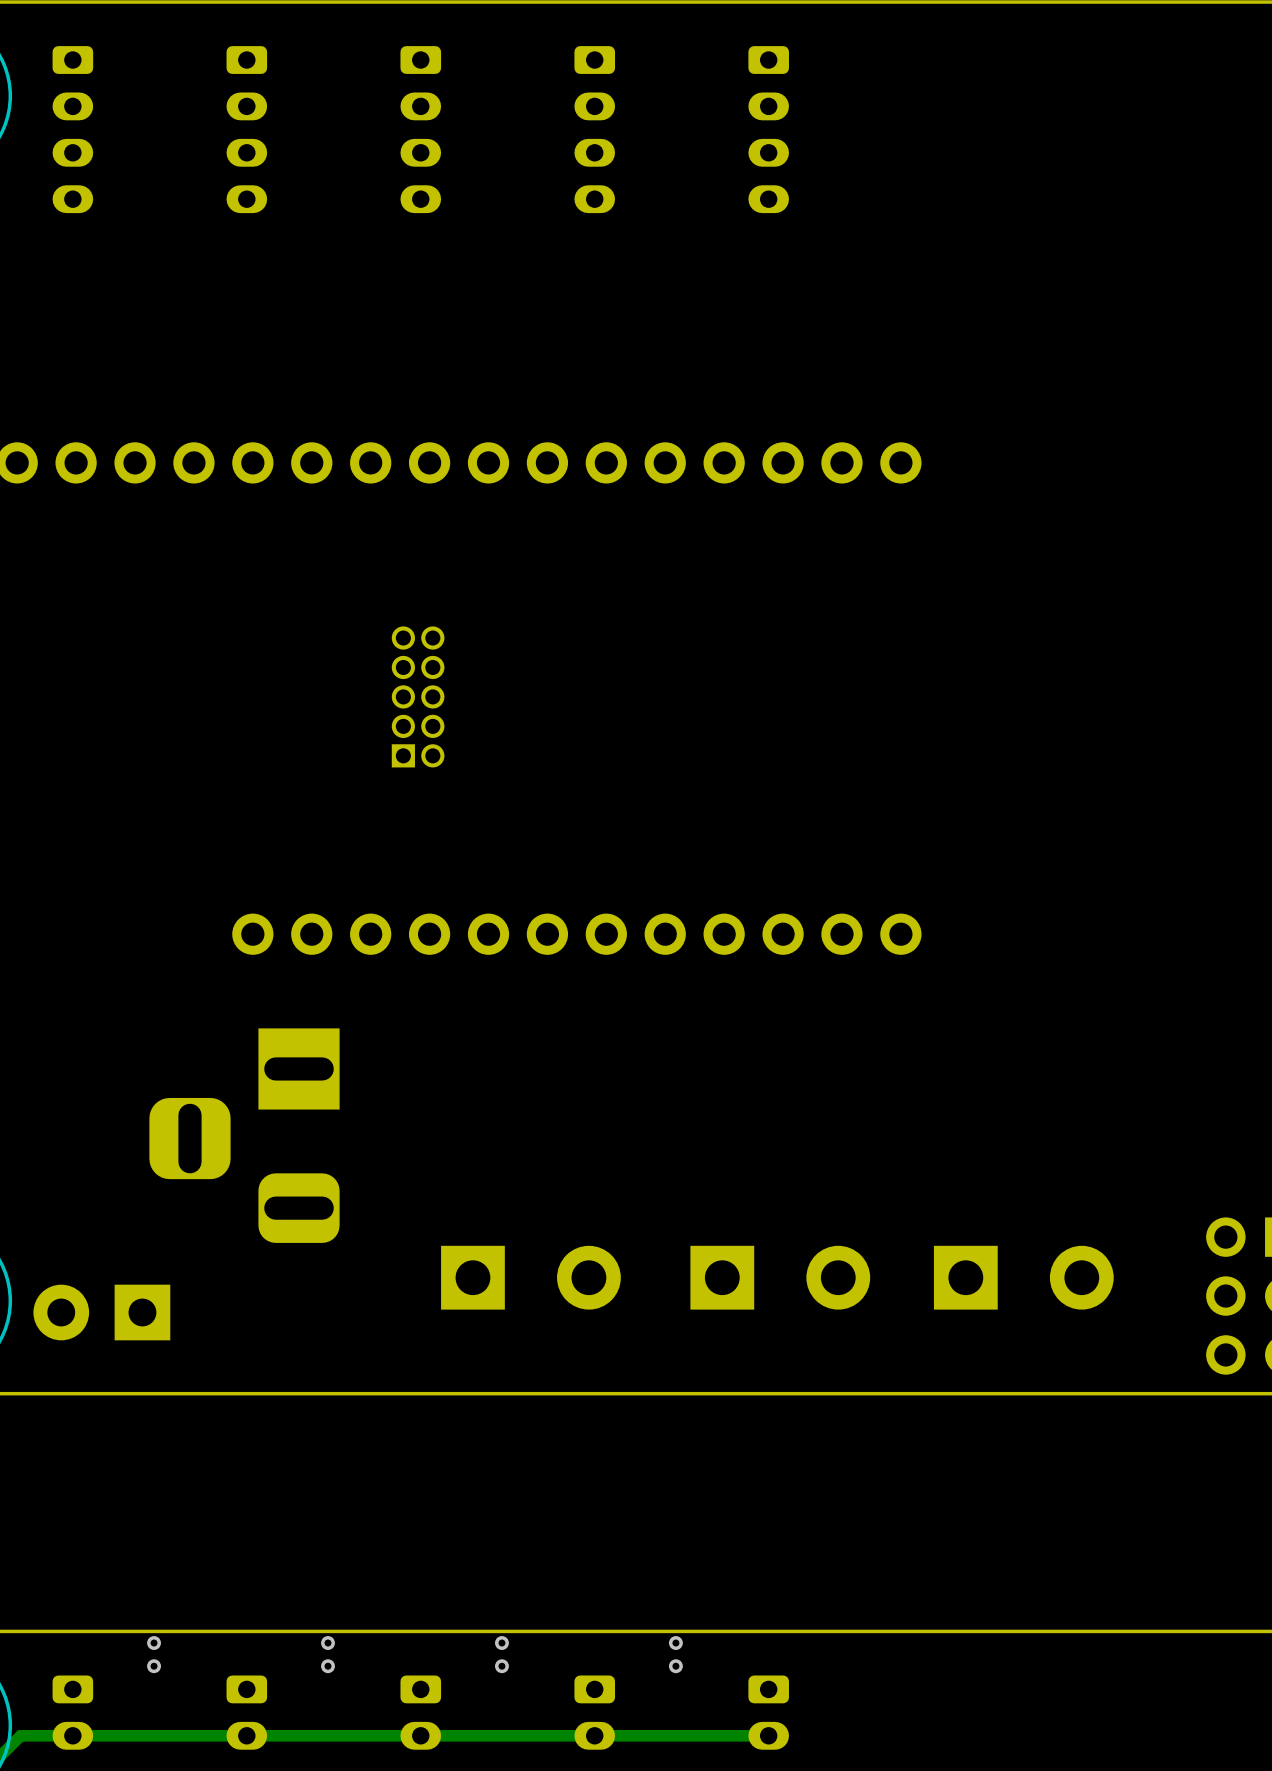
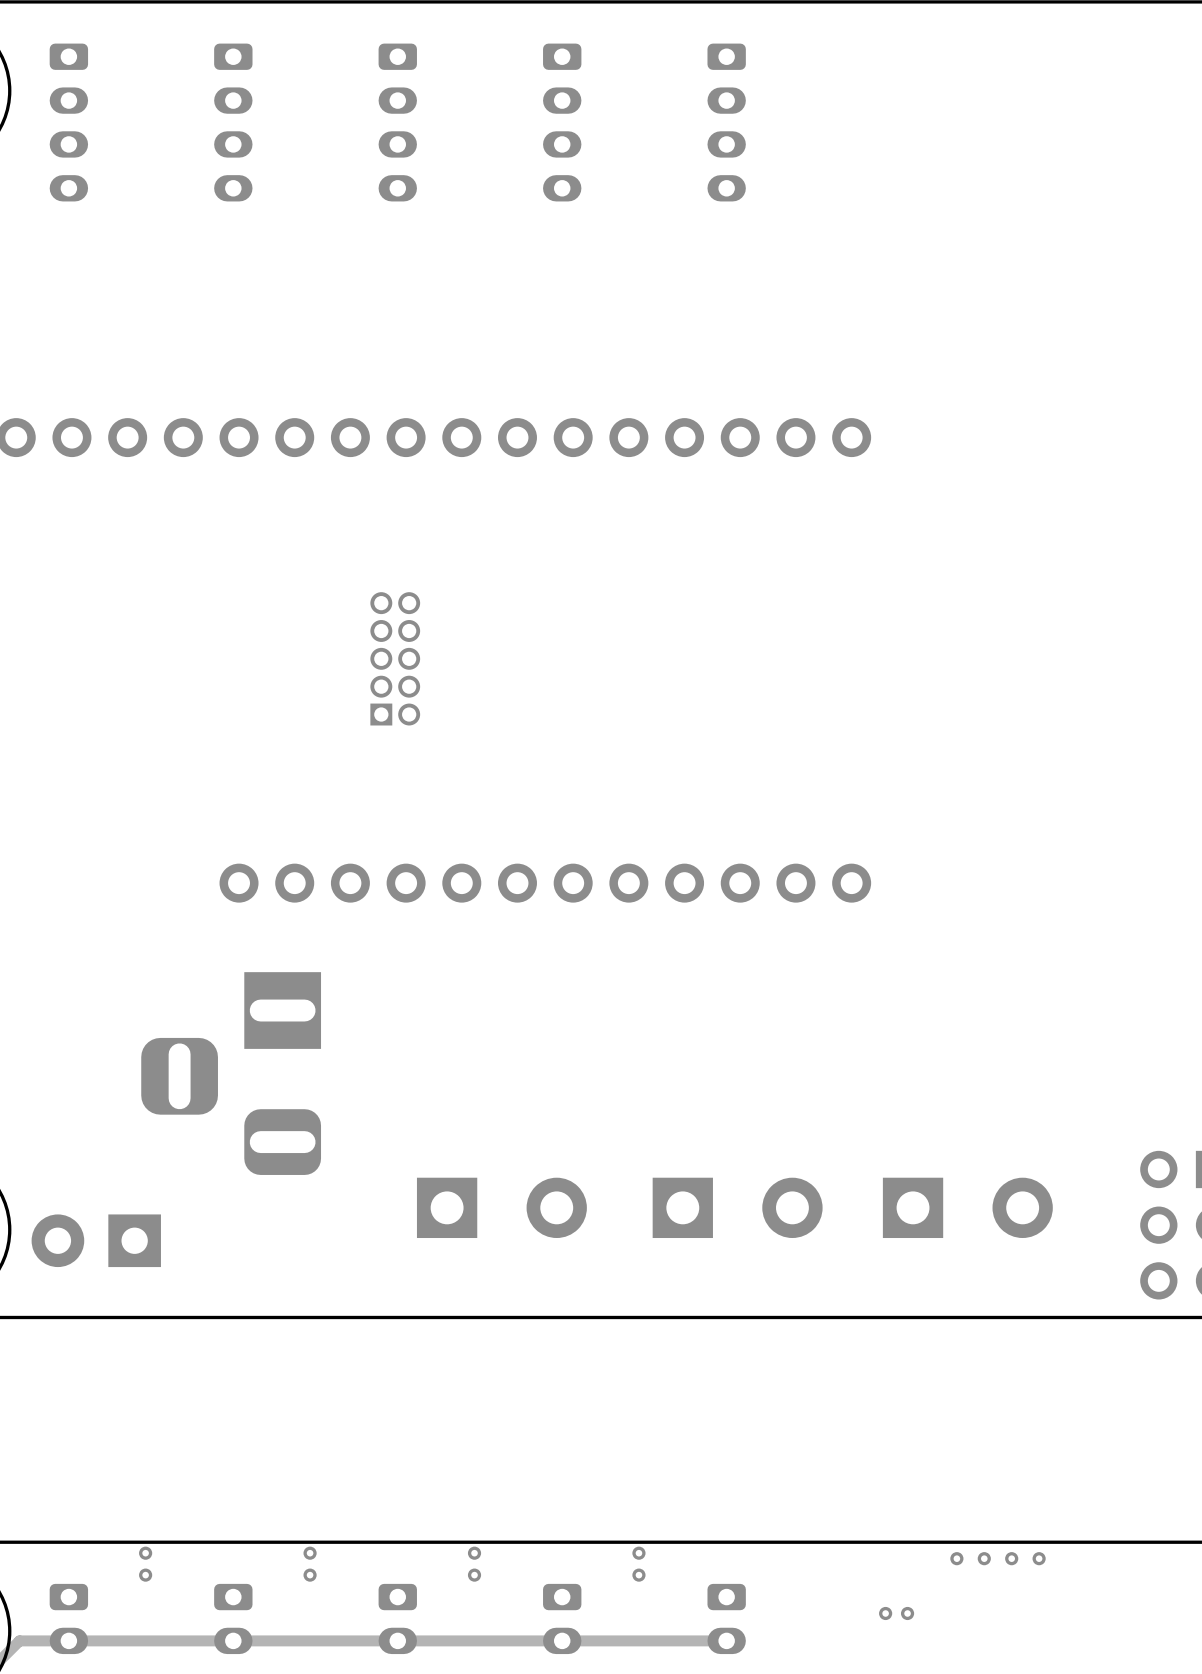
via: none -> (956, 1558)
via: none -> (984, 1558)
via: none -> (1011, 1558)
via: none -> (1039, 1558)
via: none -> (885, 1613)
via: none -> (907, 1613)

